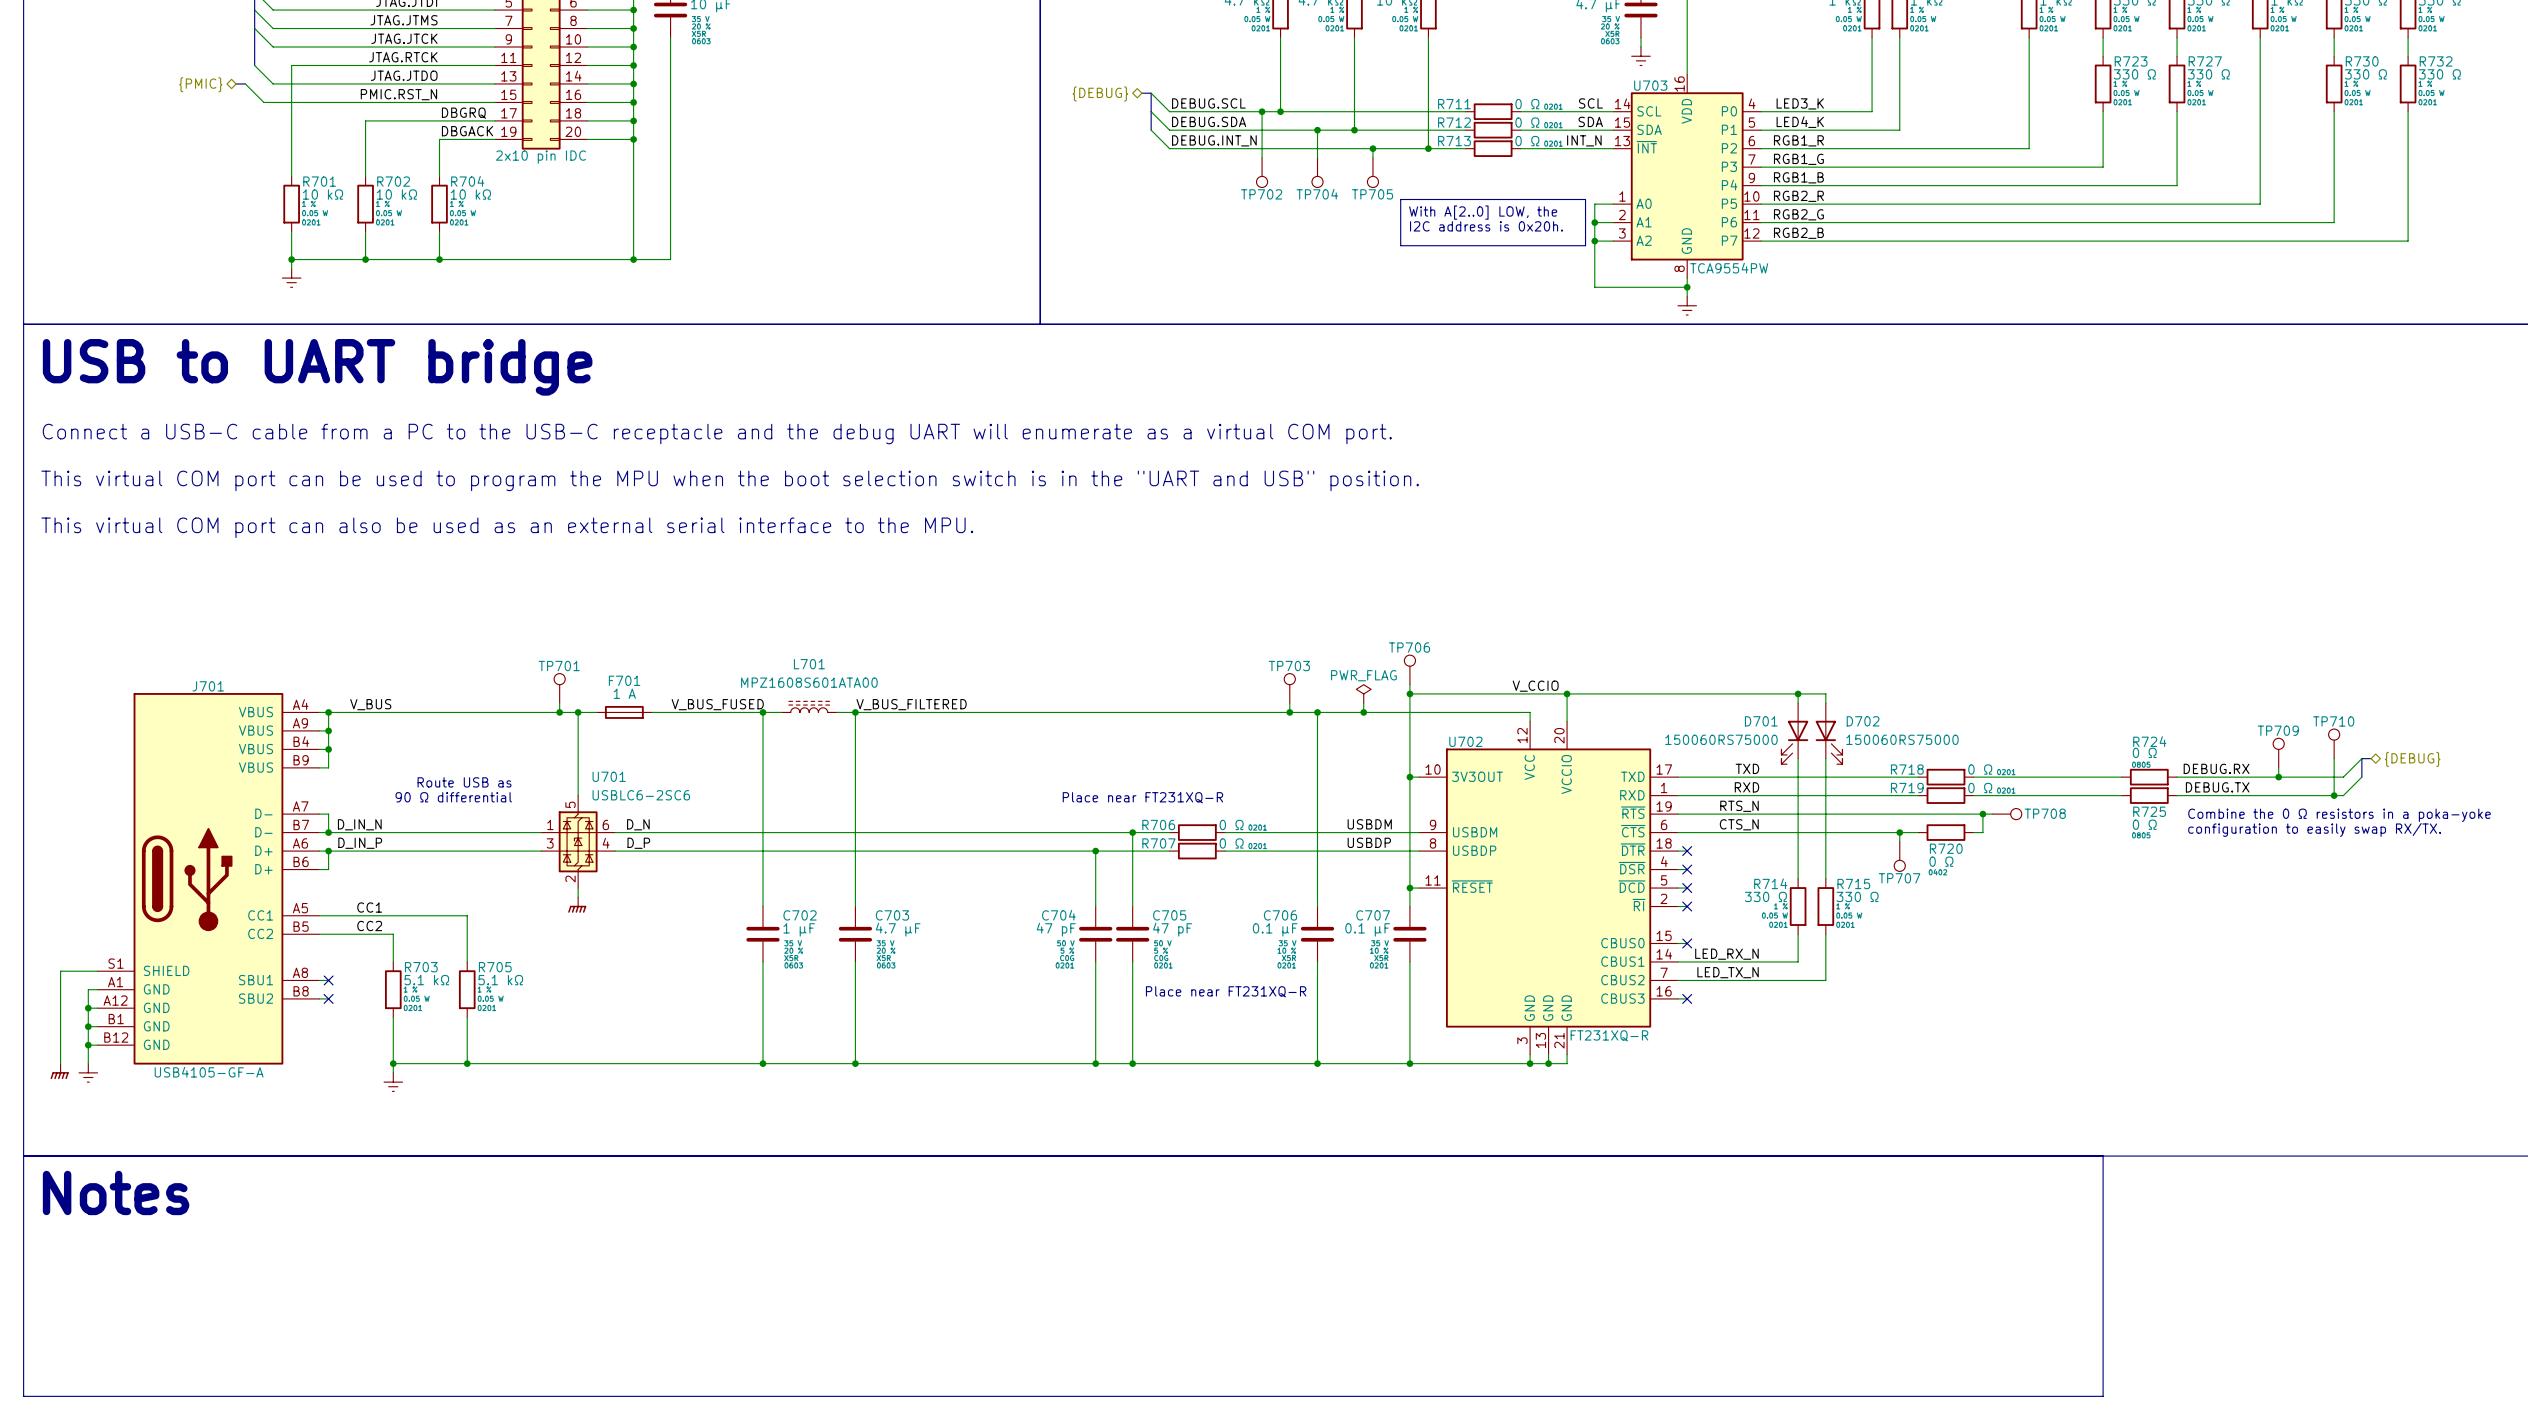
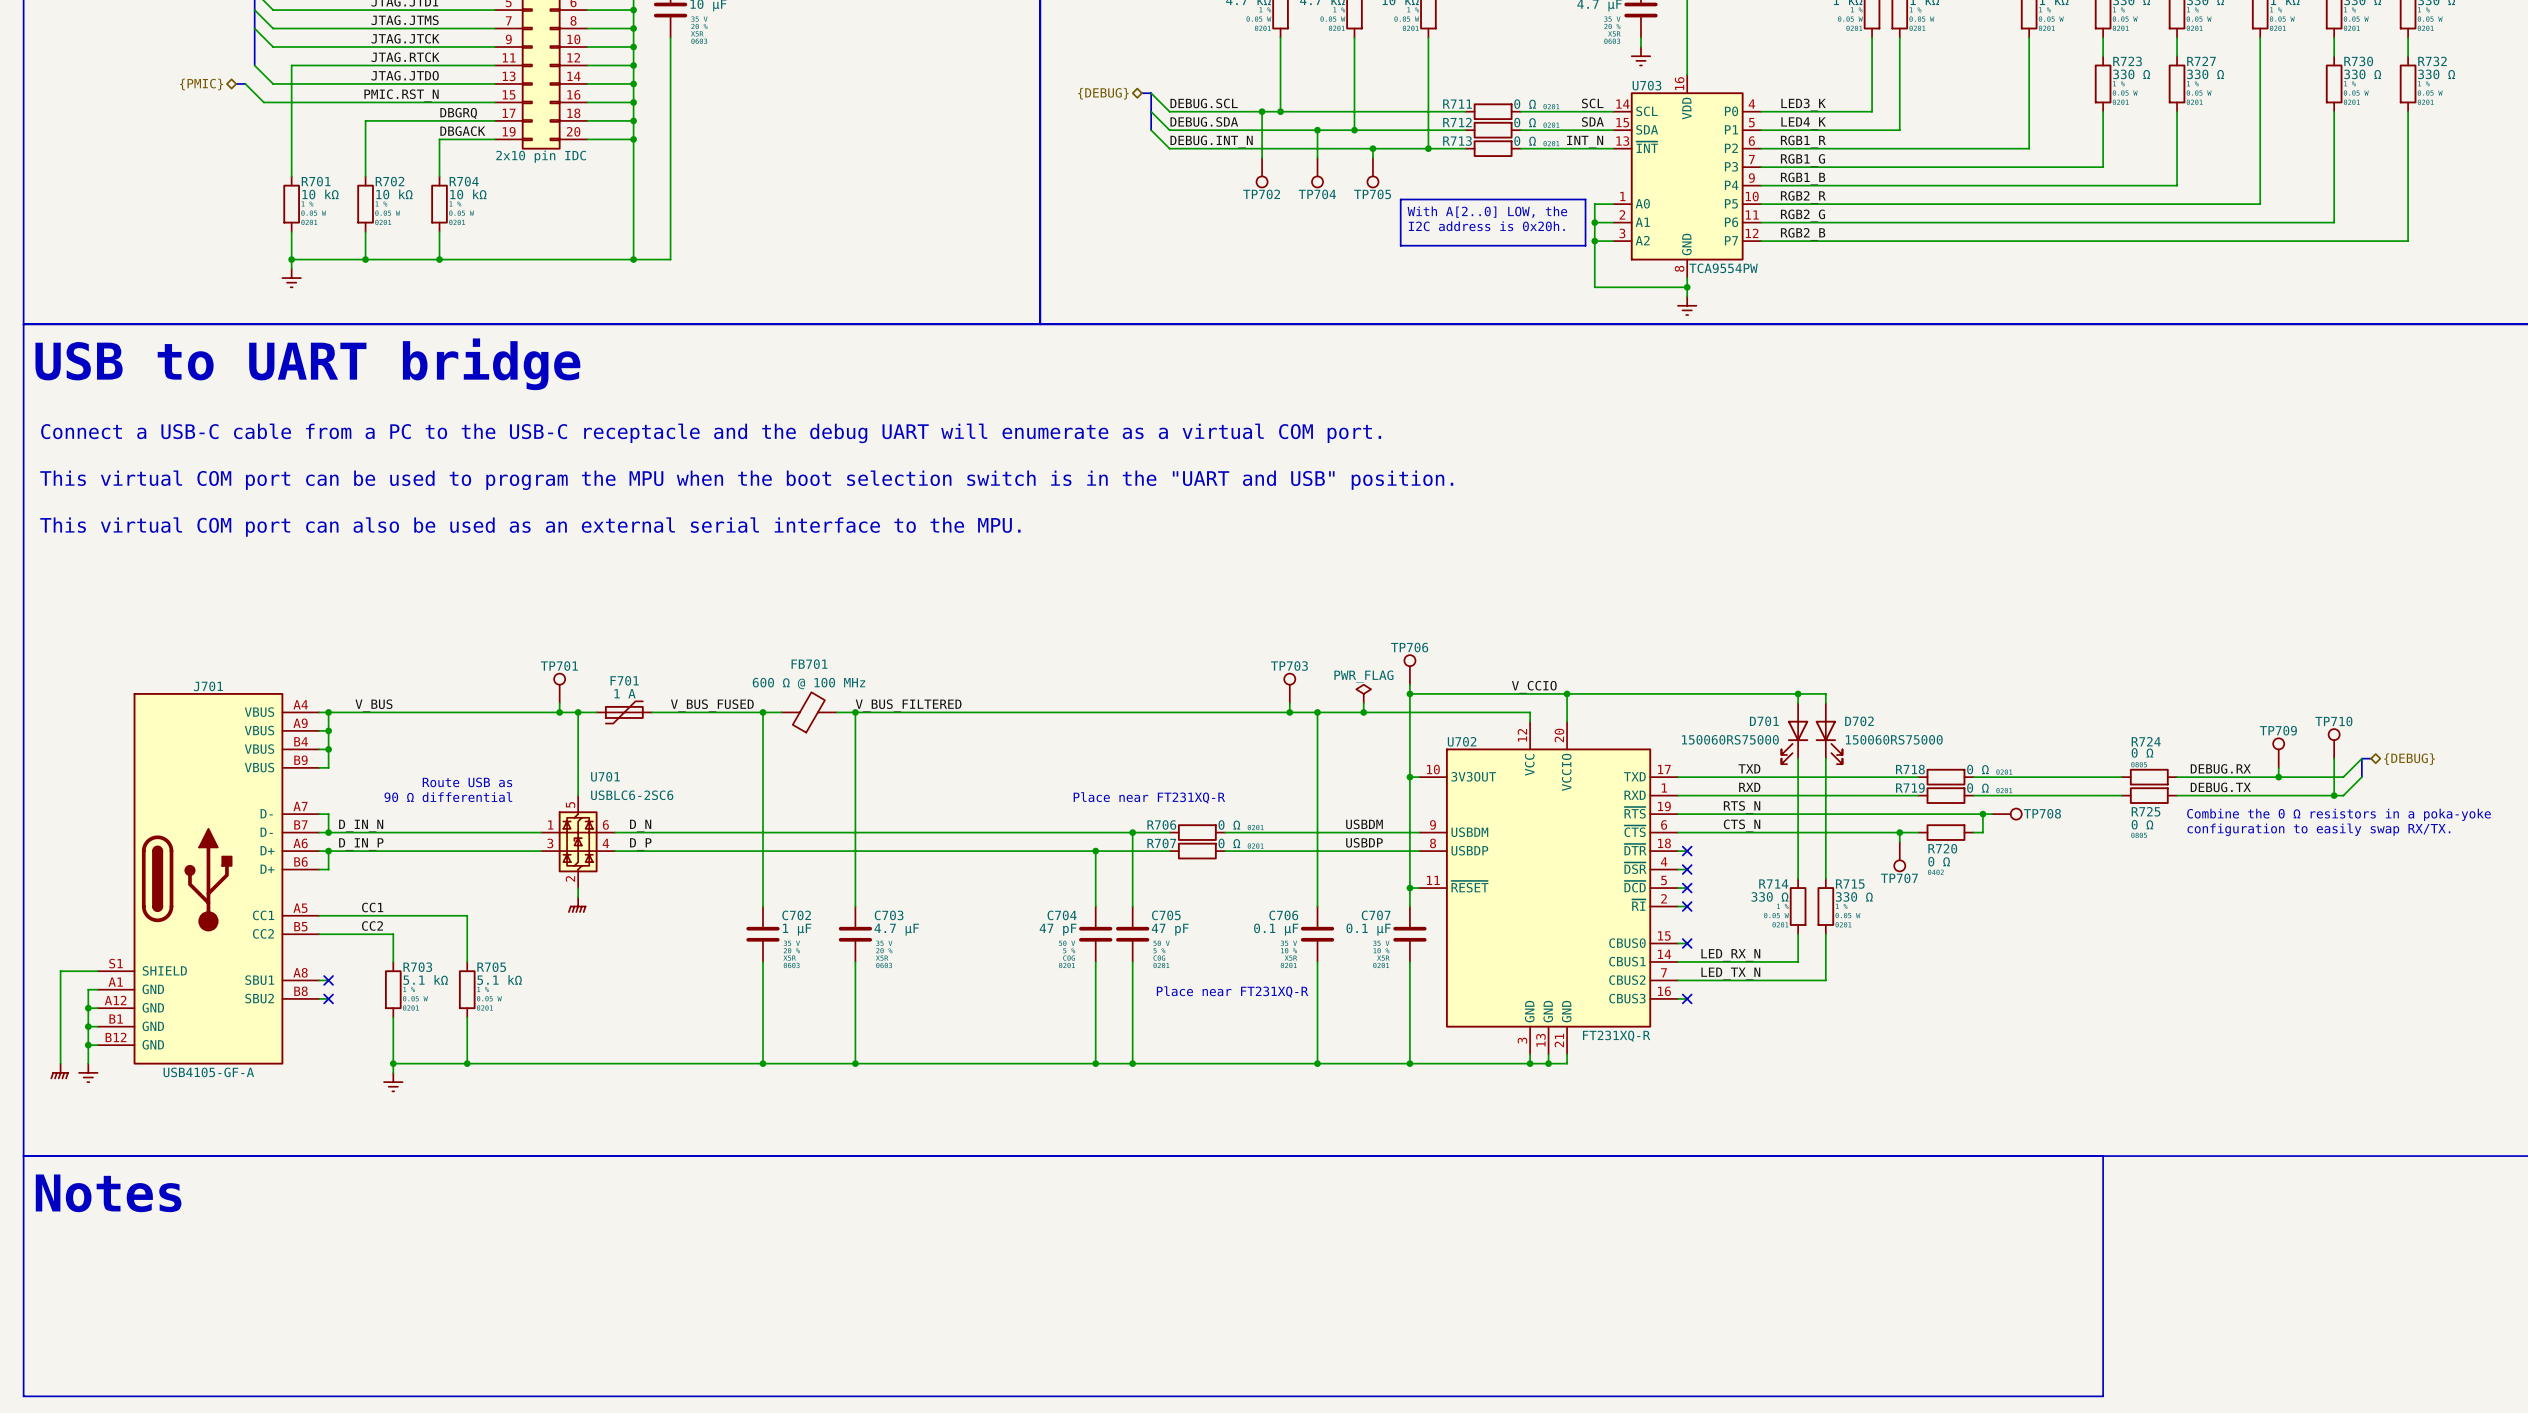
F701 symbol: [596, 705, 653, 719] -> [596, 701, 653, 724]
L701: MPZ1608S601ATA00 (809, 706) -> none
FB701: none -> 600 Ω @ 100 MHz (809, 712)

